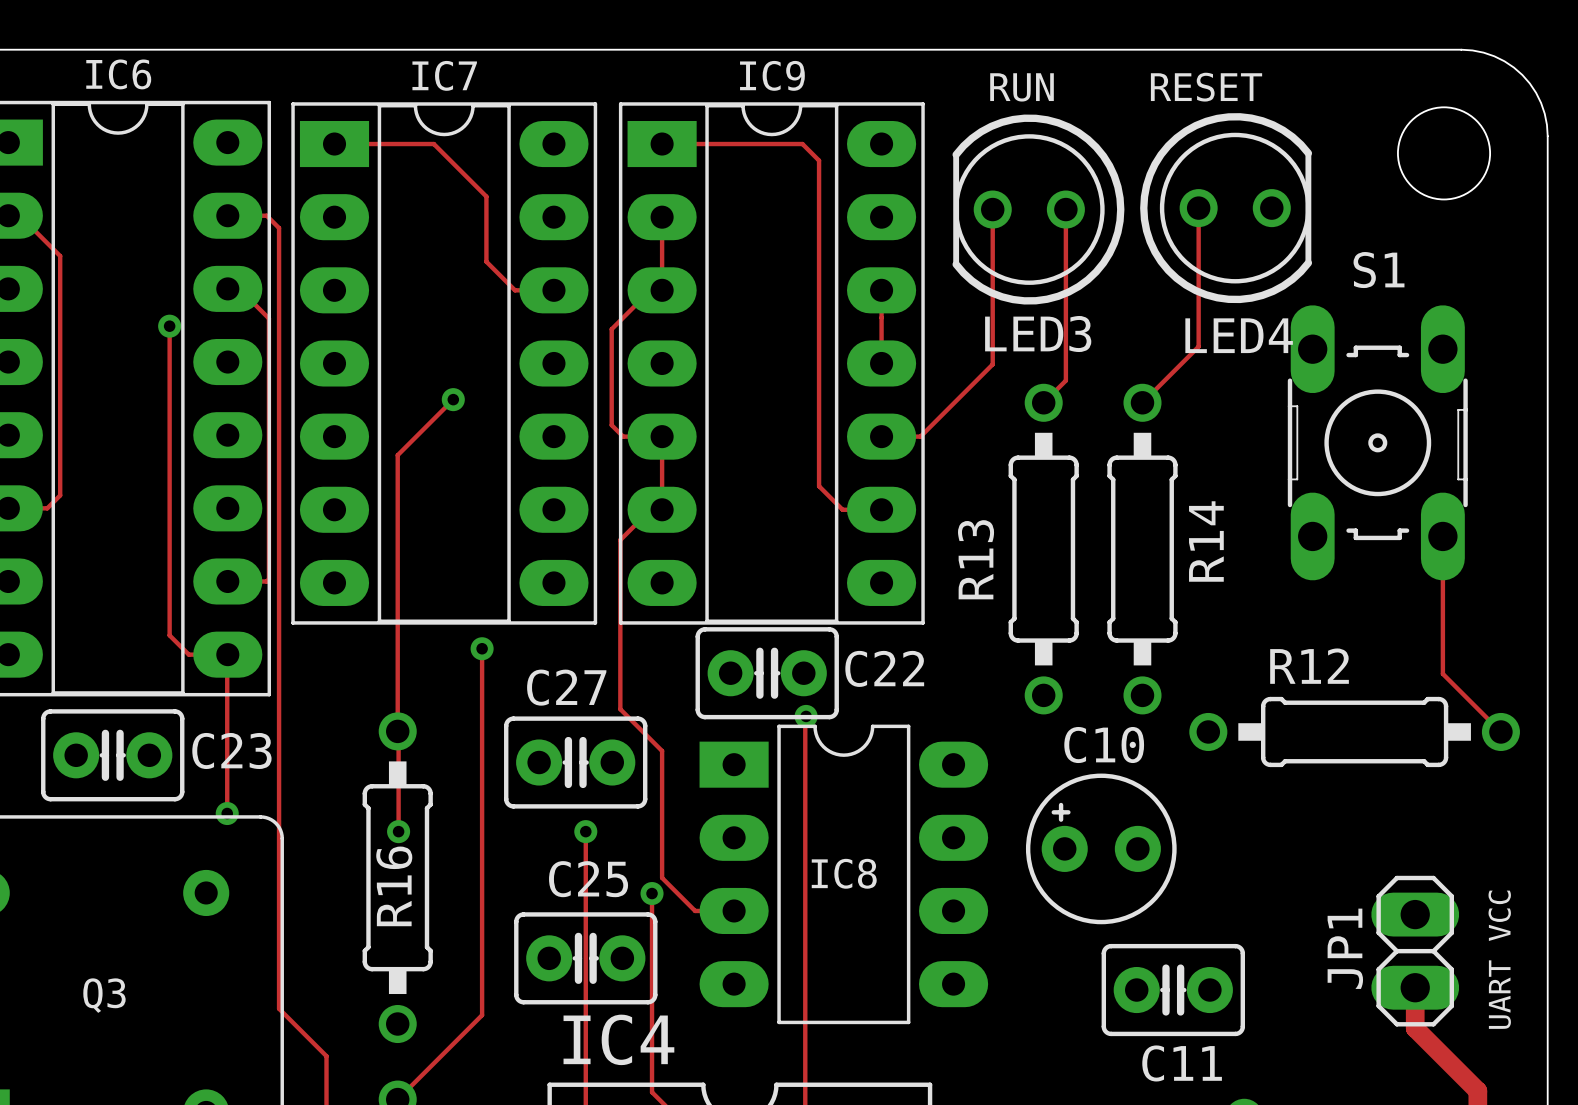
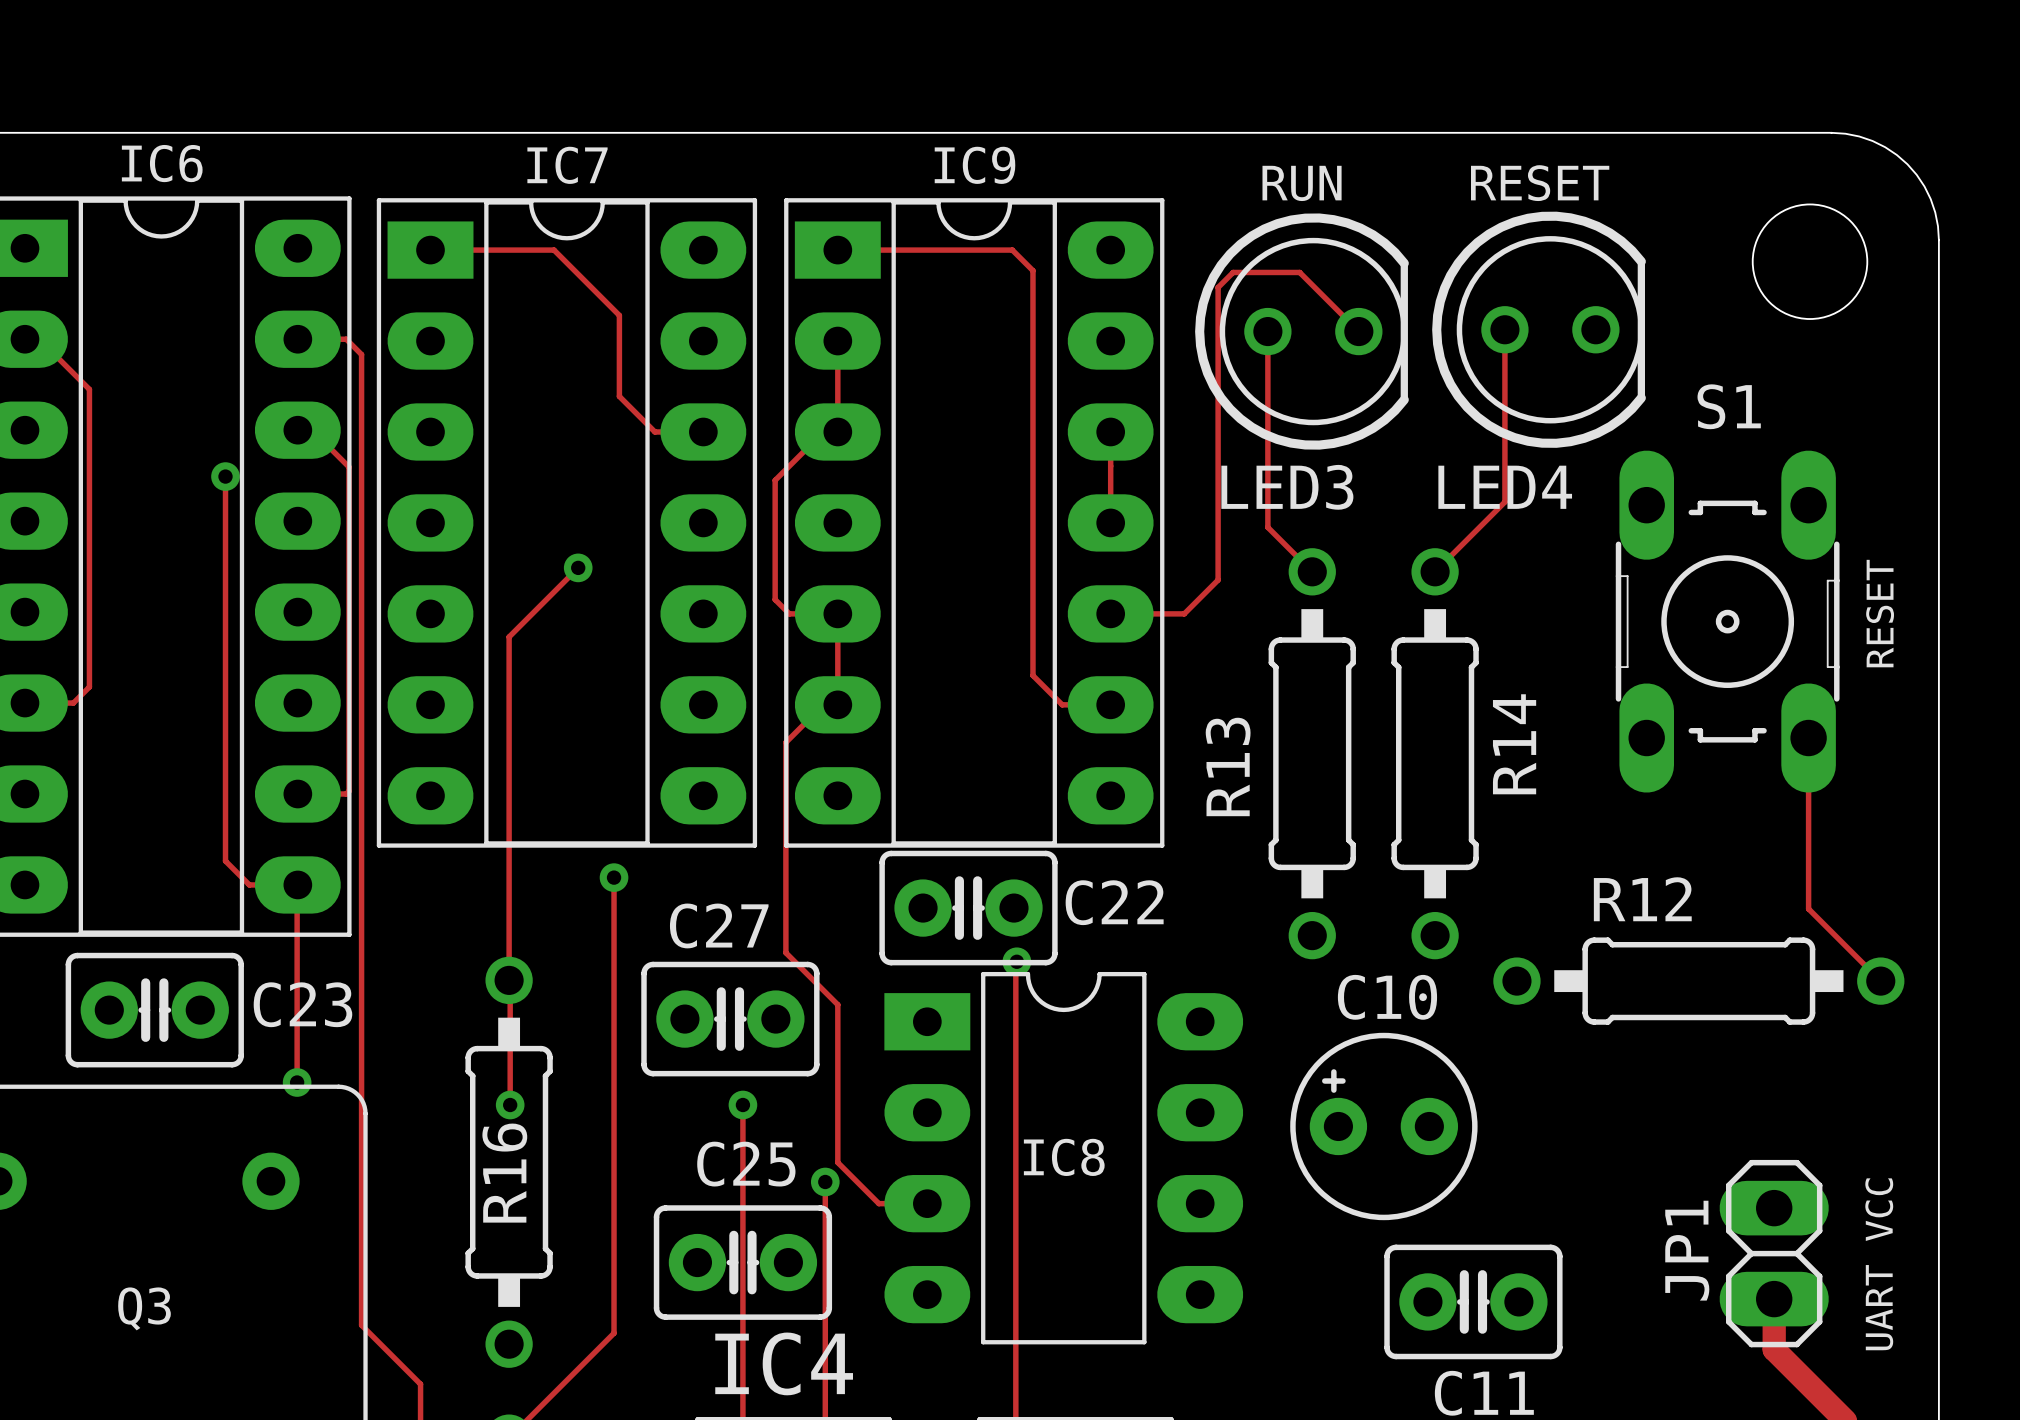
text: RUN RESET (1126, 87) -> none
text: none -> RUN (1302, 183)
text: none -> RESET (1540, 183)
track: (992, 209) (992, 364) (920, 436) -> (1358, 331) (1299, 272) (1233, 272) (1218, 287) (1218, 580) (1184, 613) (1159, 613)
LED3 rotation: 0° (1038, 209) -> 180° (1301, 331)
track: (1065, 209) (1065, 380) (1043, 402) -> (1267, 331) (1267, 527) (1312, 571)
LED4 name position: LED4 (1239, 335) -> LED4 (1505, 487)
text: none -> RESET (1880, 613)

